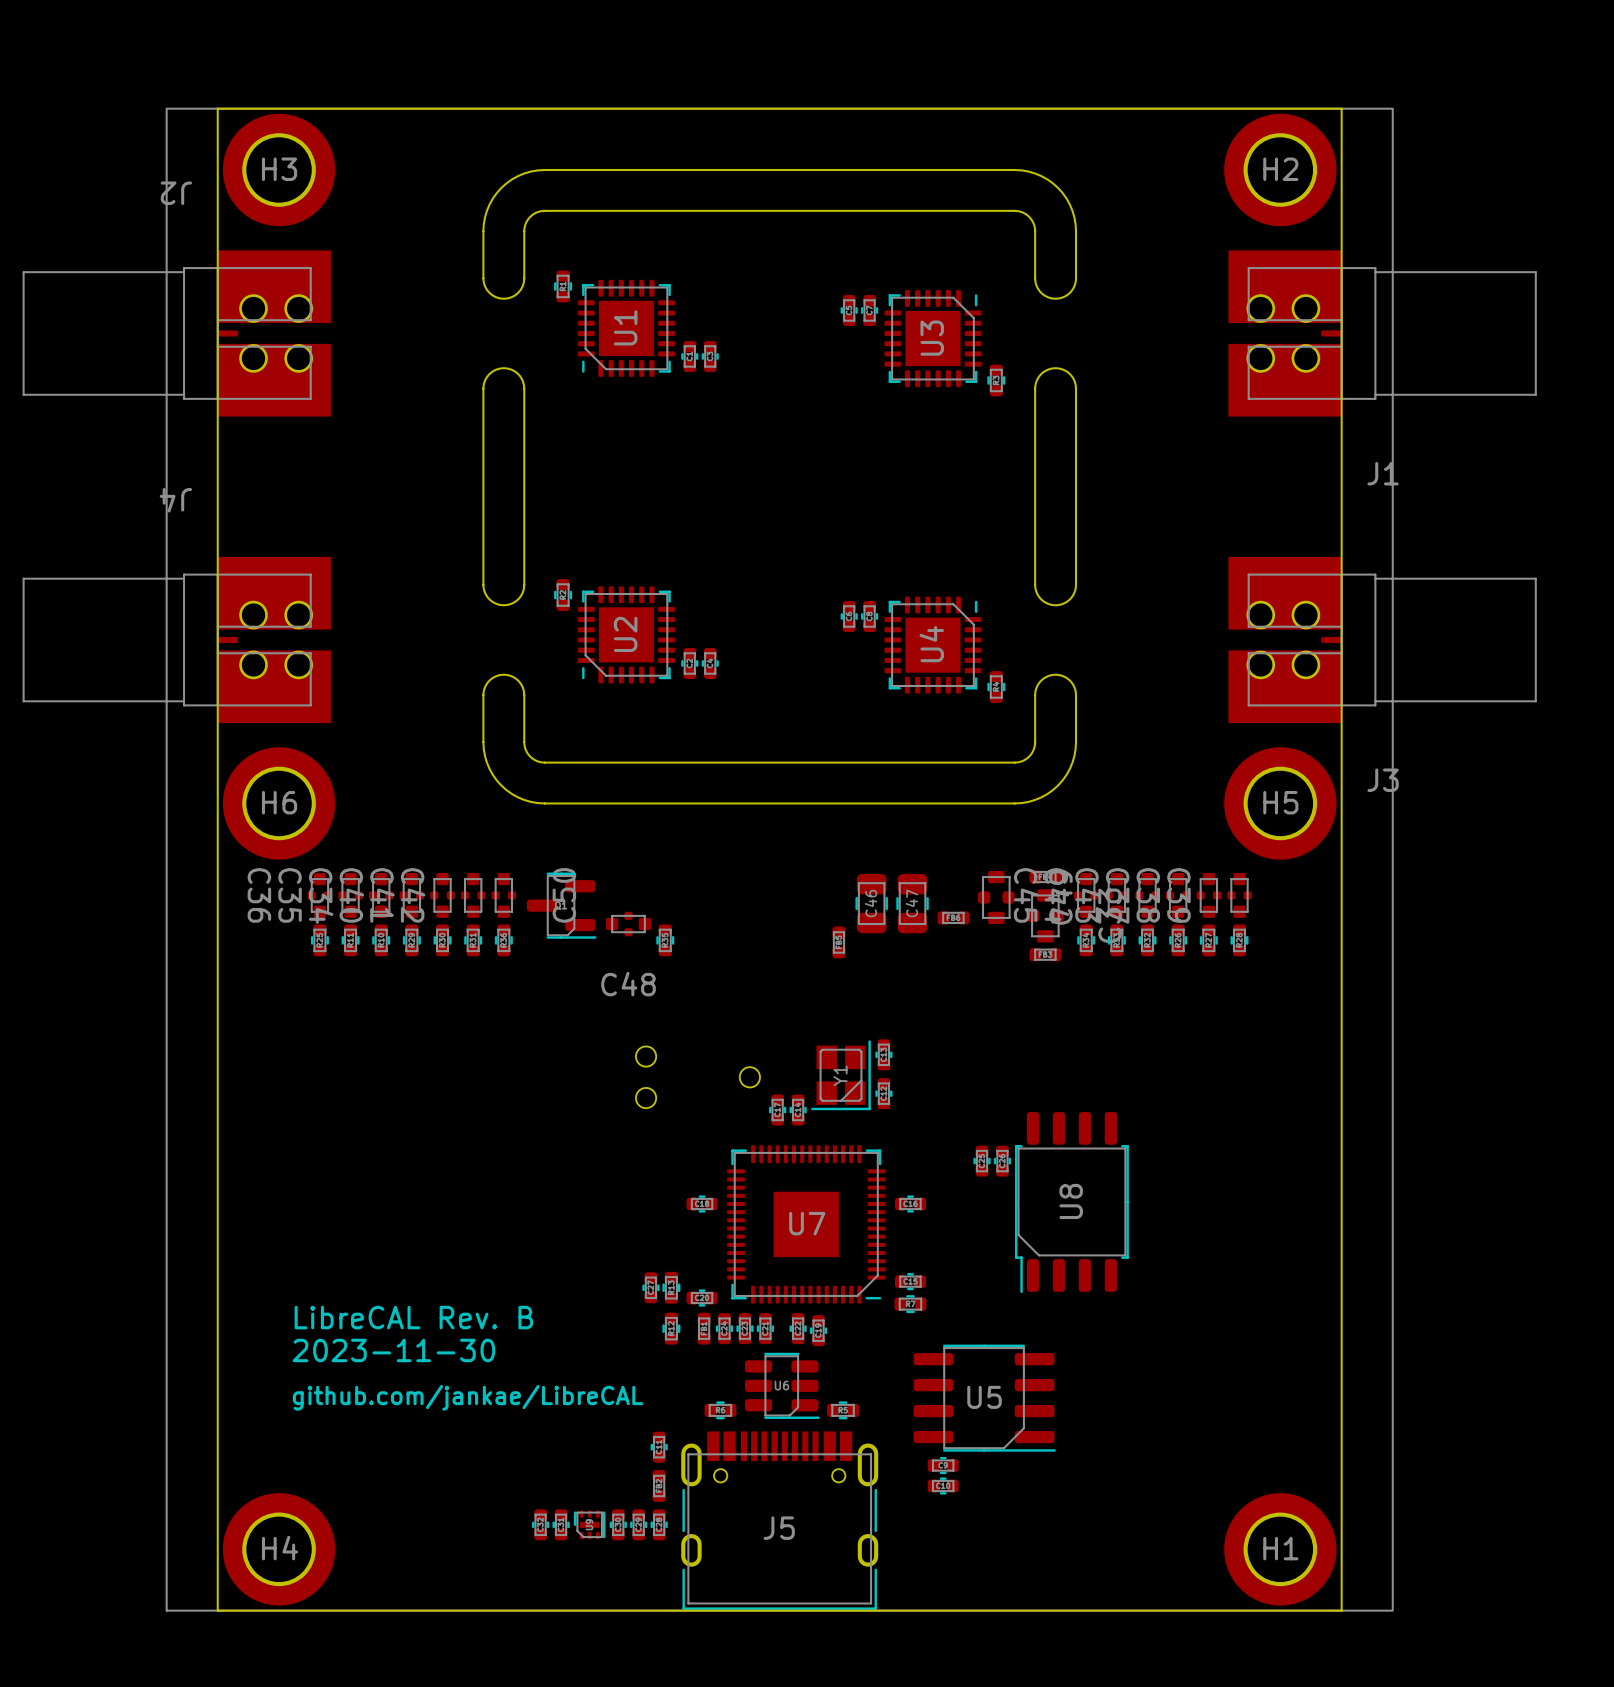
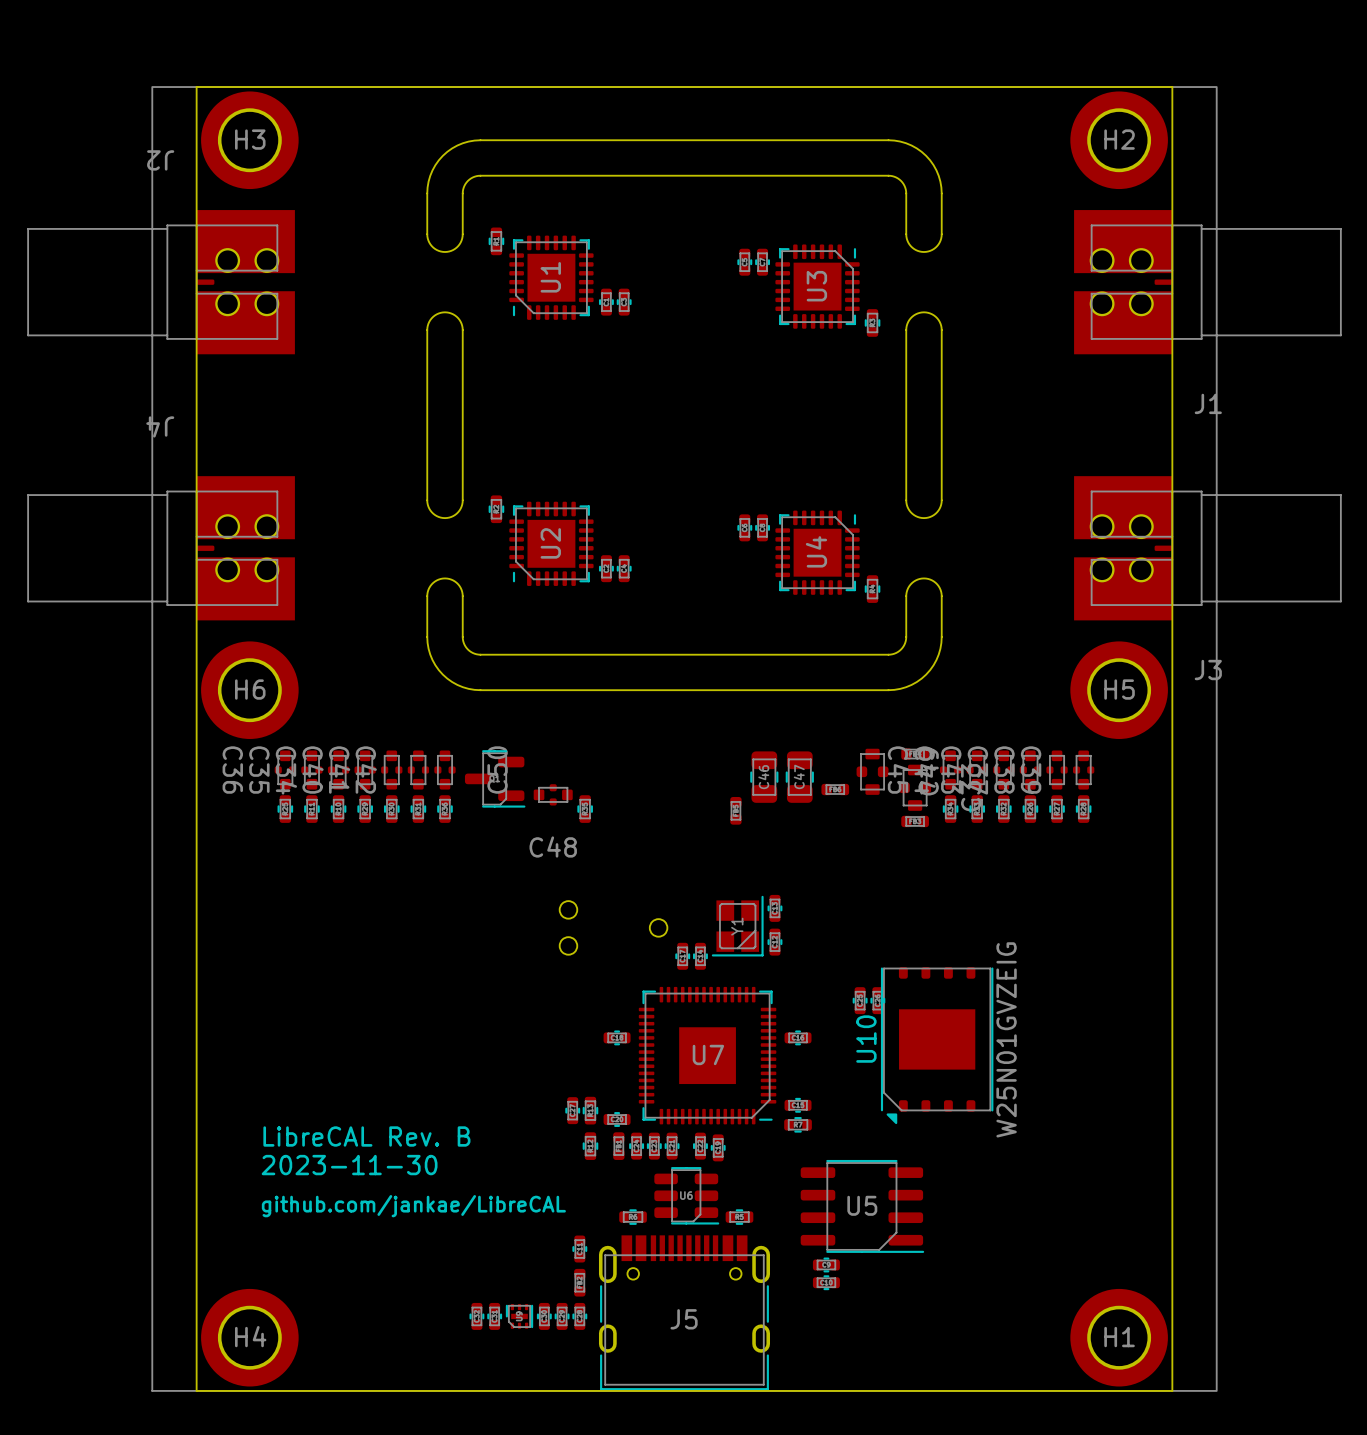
U8: (1071, 1202) -> none
U10: none -> W25N01GVZEIG (937, 1045)

